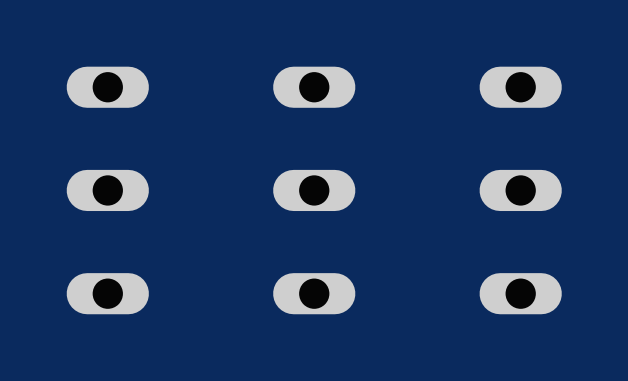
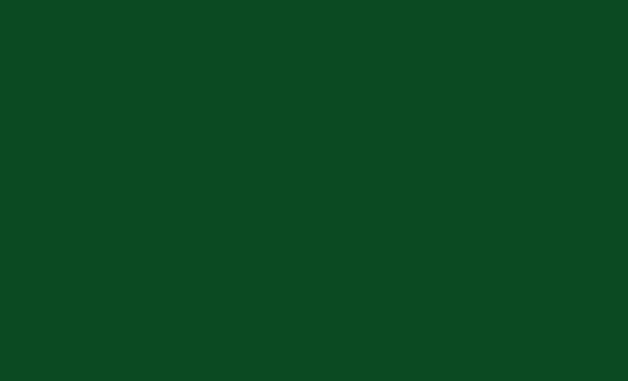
part: (107, 190) -> none
part: (314, 190) -> none
part: (520, 190) -> none

